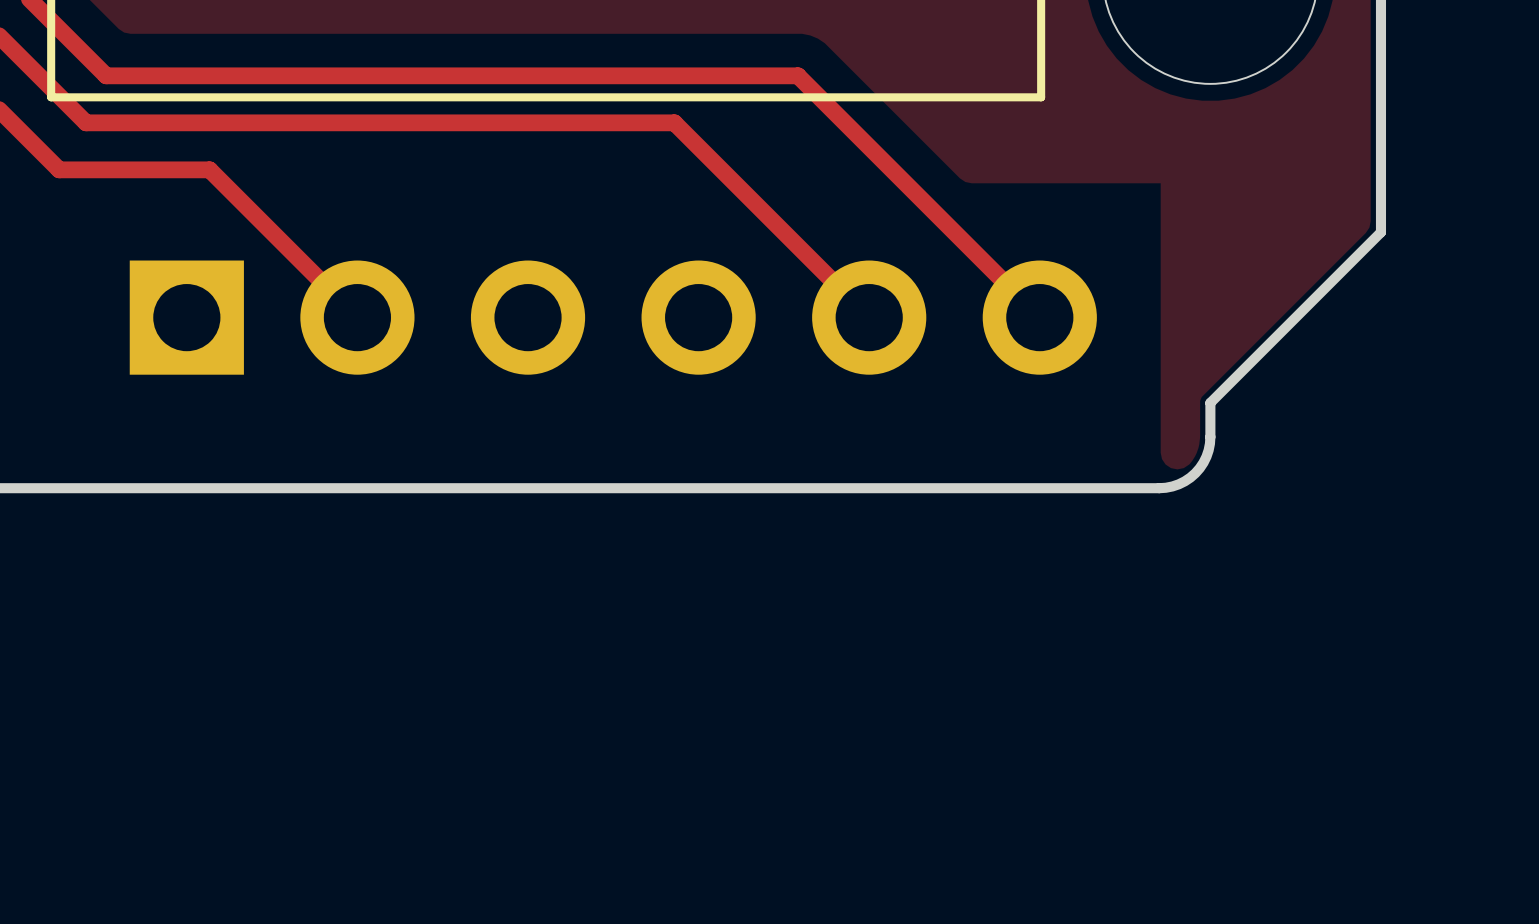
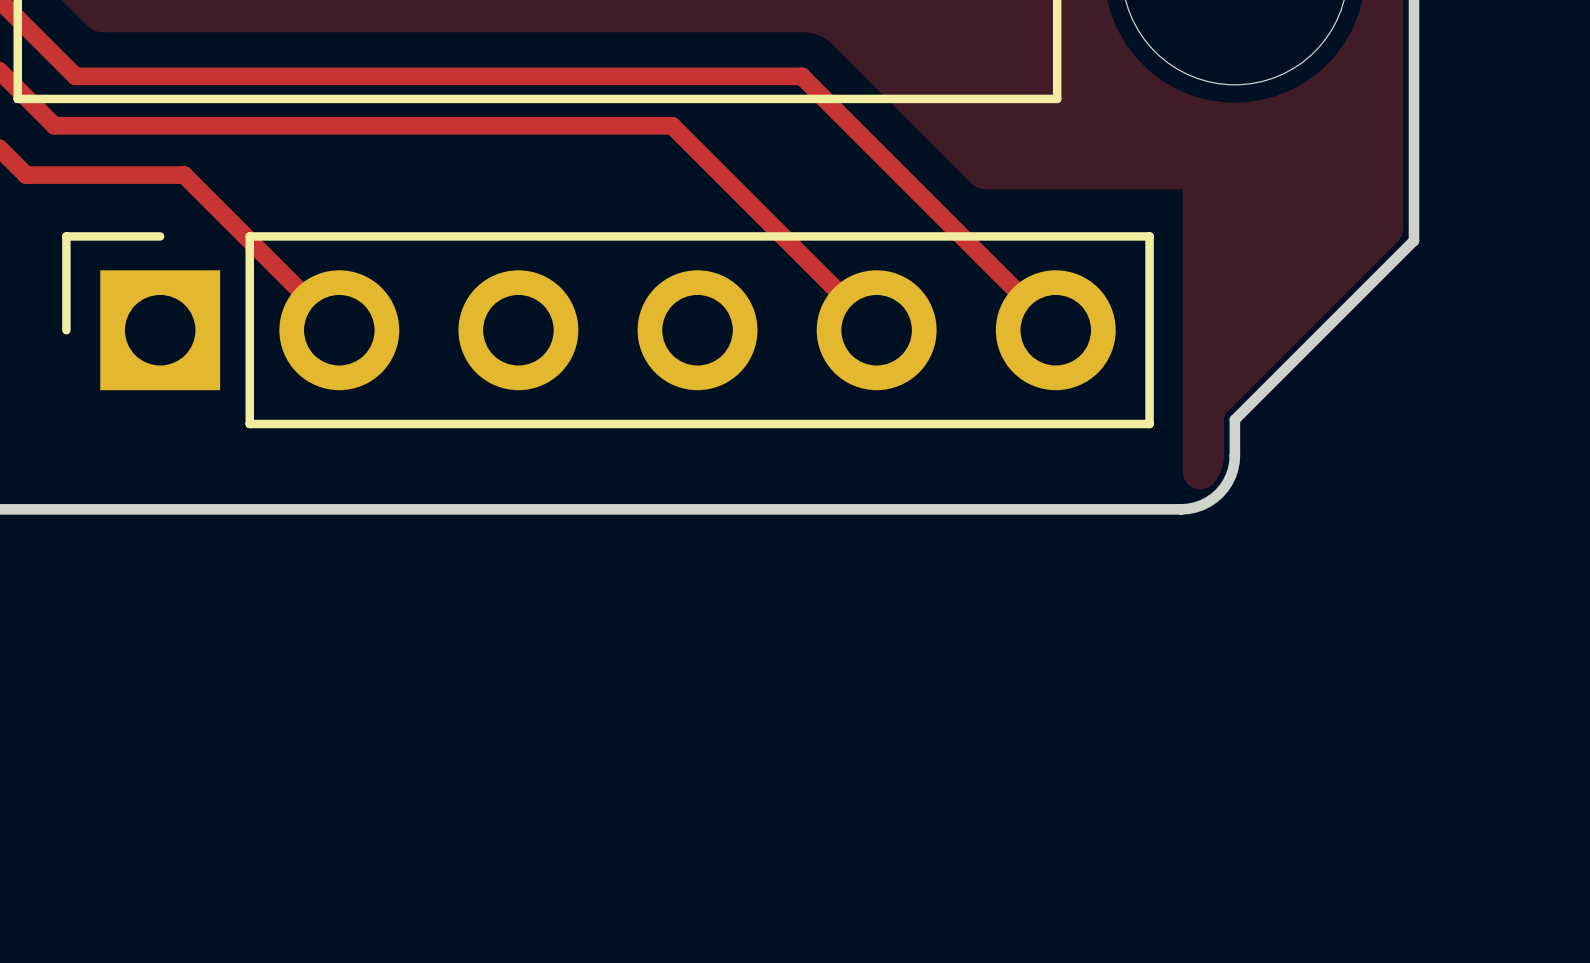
part side: bottom (613, 317) -> top (607, 330)

